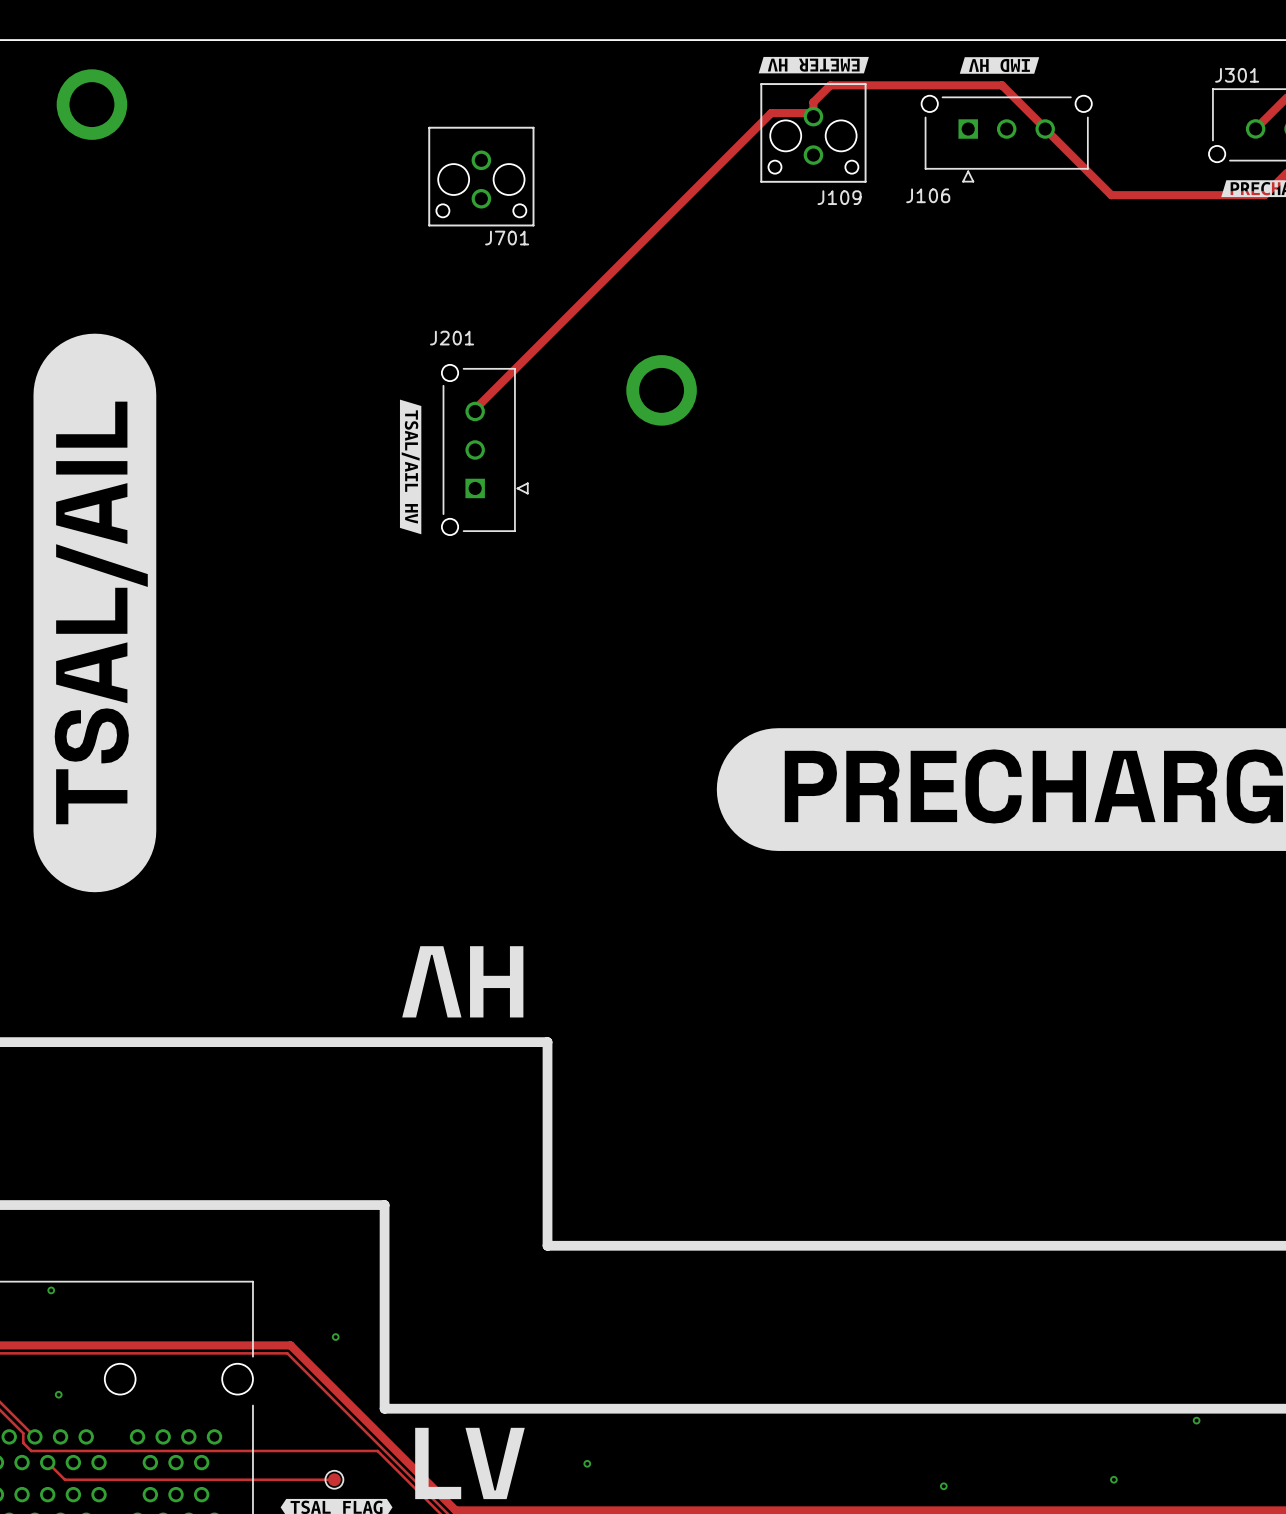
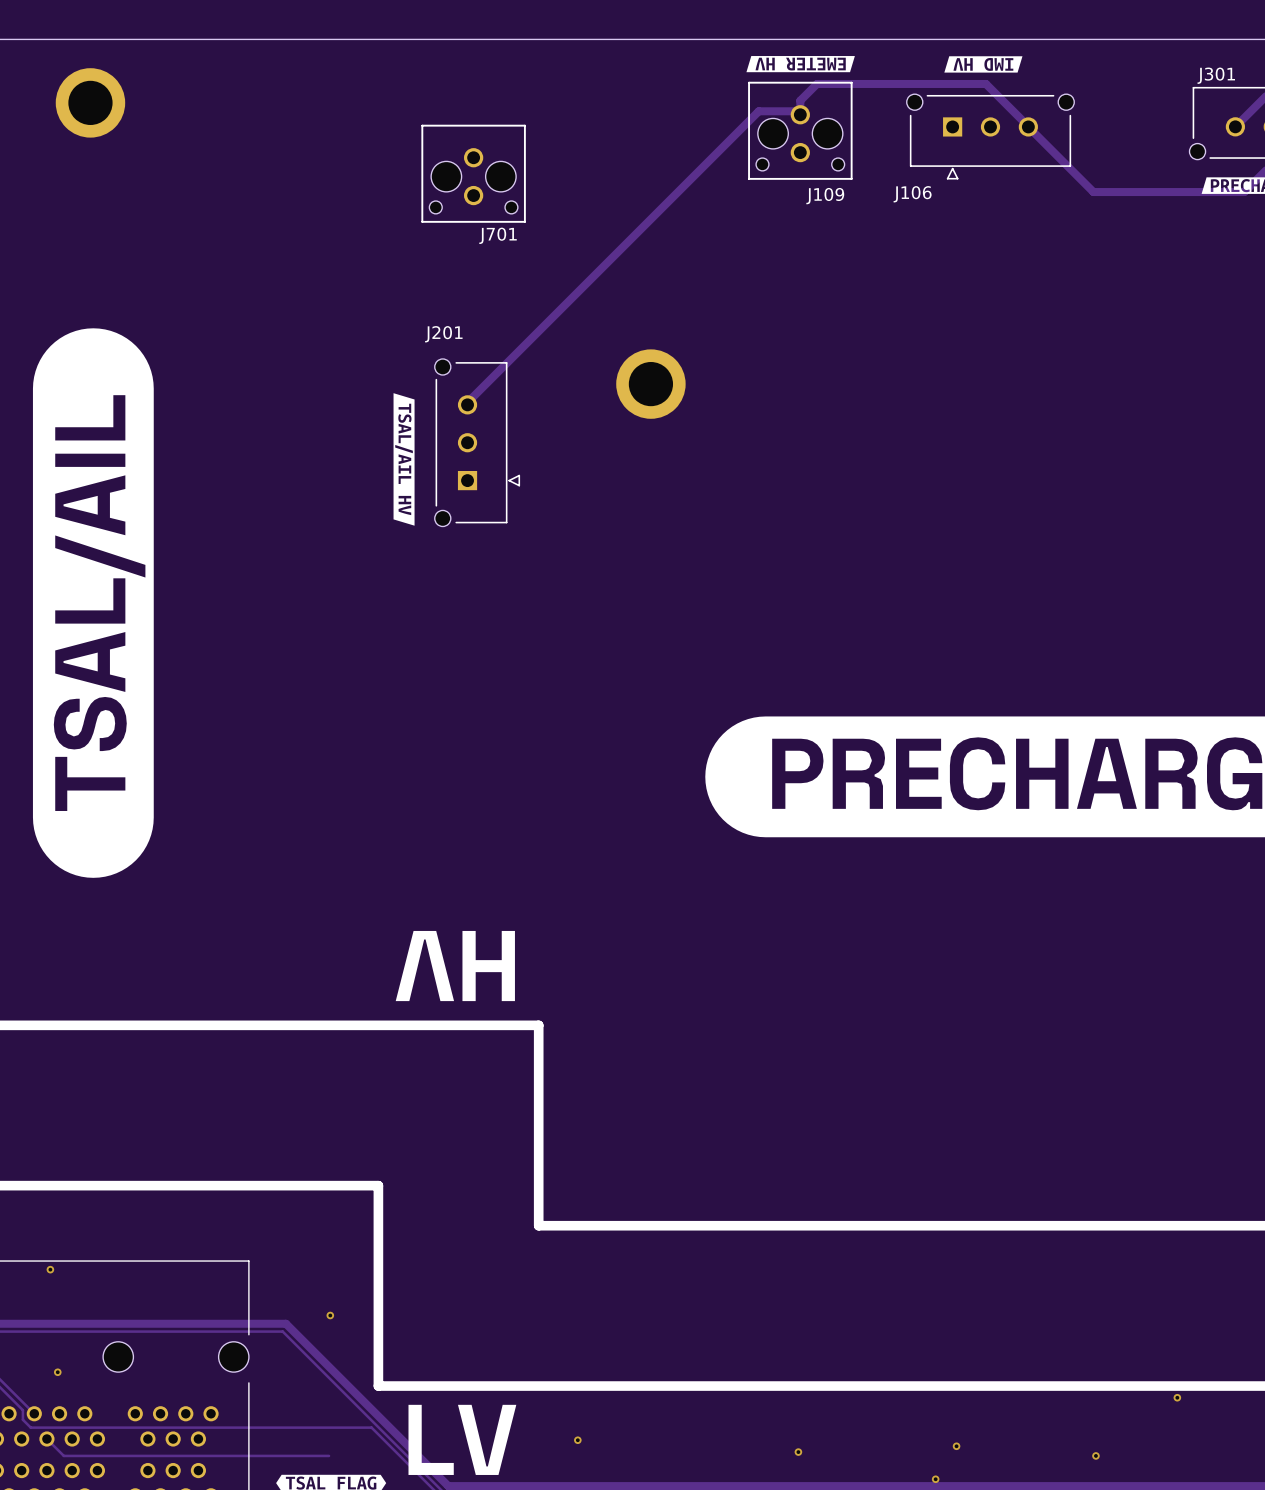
via: none -> (956, 1446)
via: none -> (798, 1452)
part: (334, 1479) -> none
via: (943, 1486) -> none
via: none -> (935, 1479)

